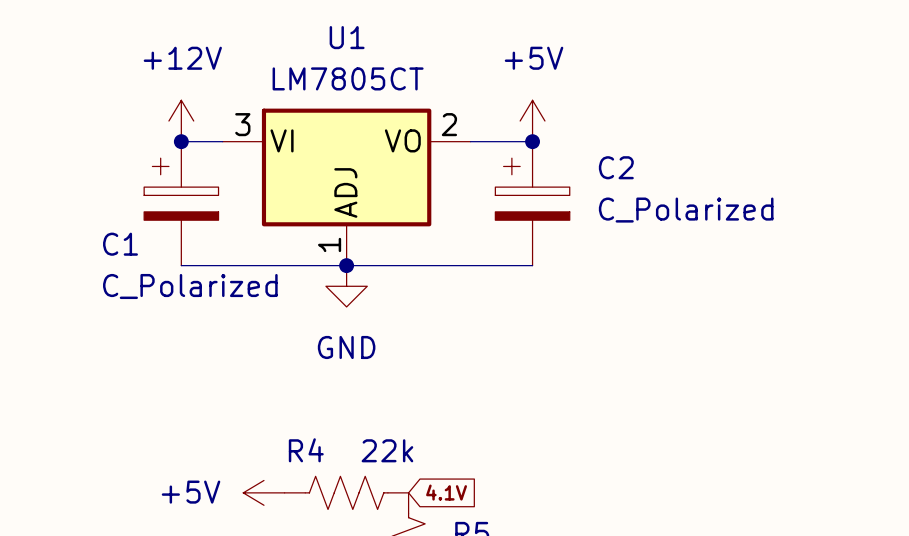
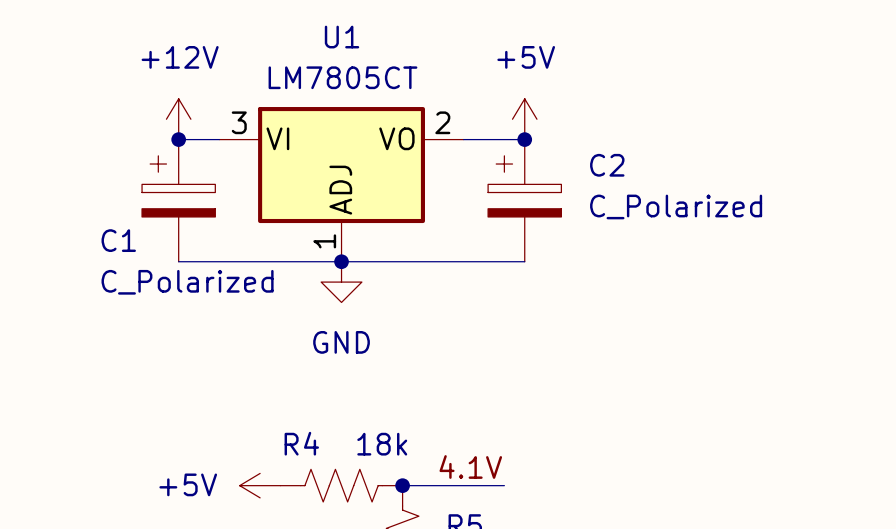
R4 value: 22k (387, 450) -> 18k (382, 444)
label: none -> 4.1V (470, 467)
wire: none -> (402, 485) (504, 485)
junction: none -> (402, 485)
global label: 4.1V (446, 492) -> none

